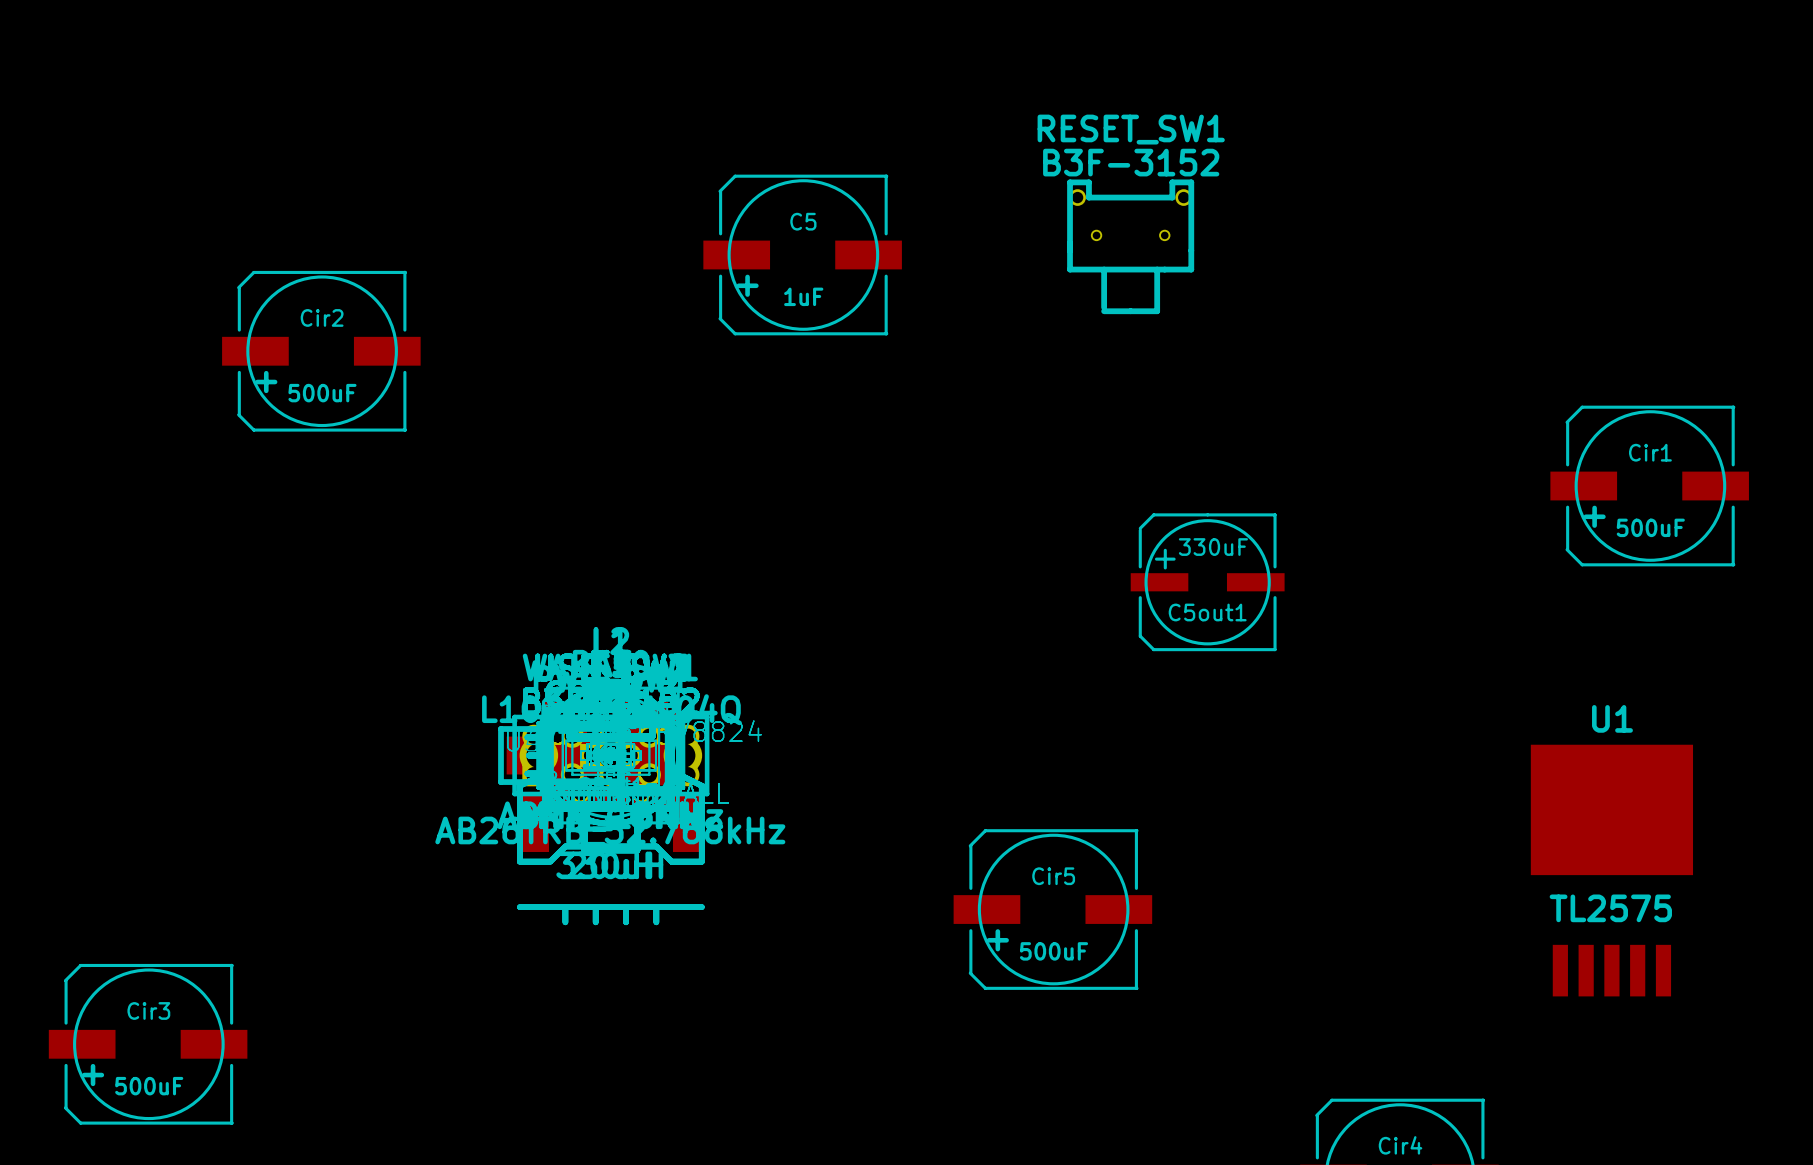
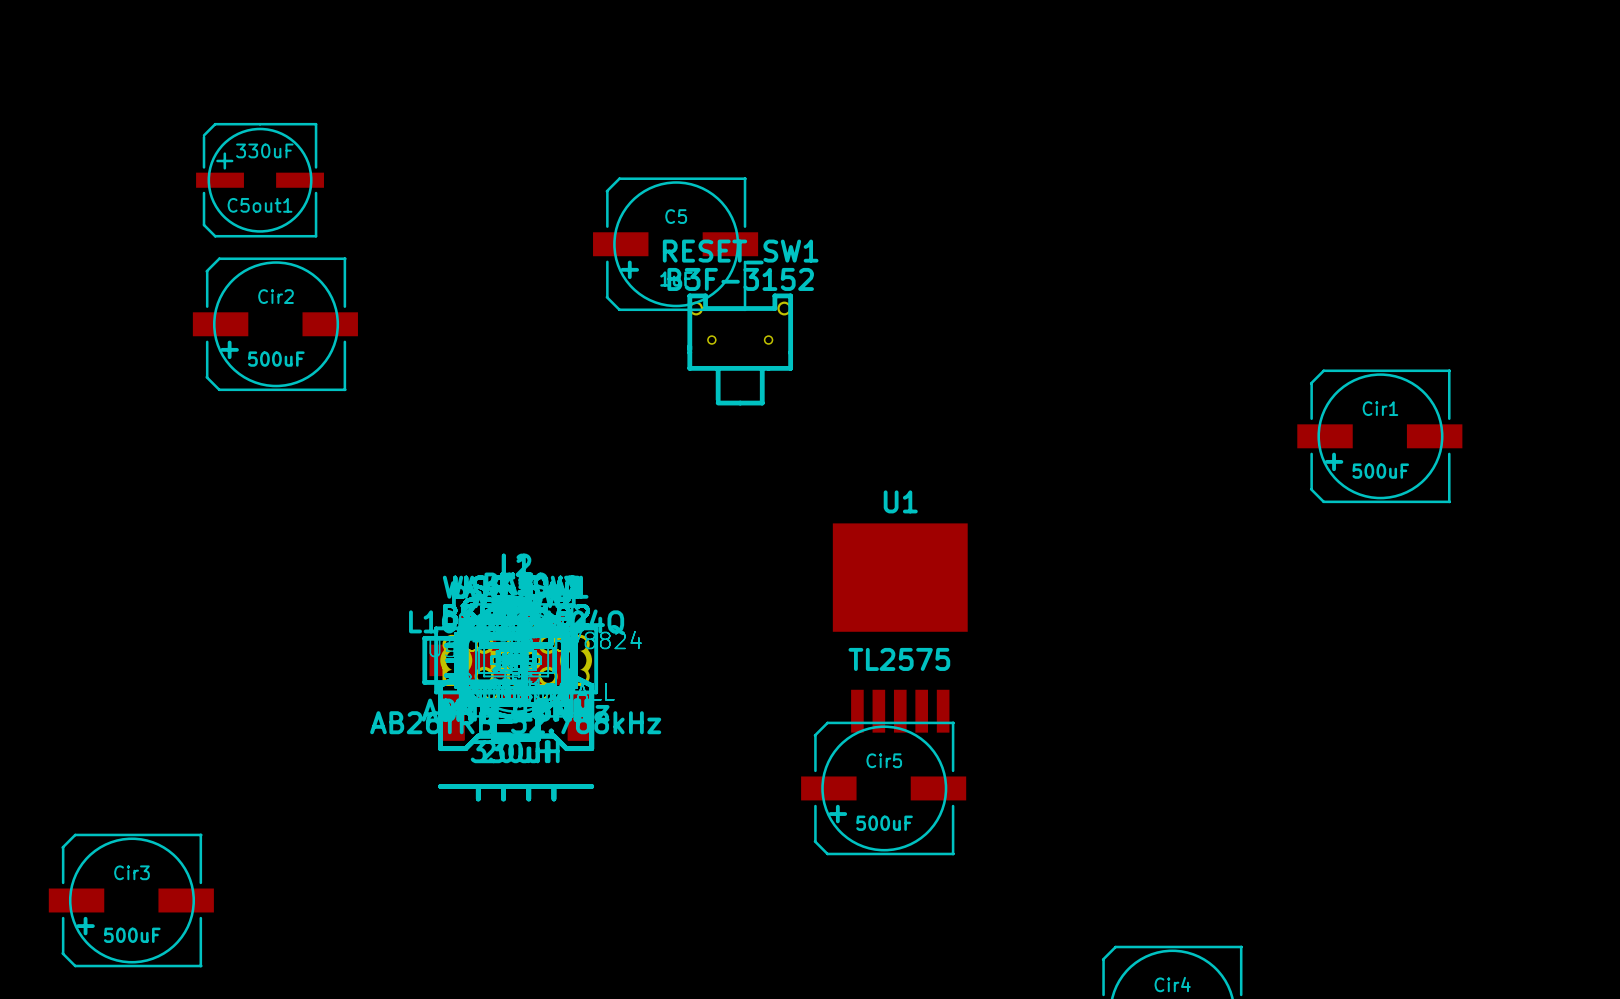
RESET_SW1 position: (1130, 246) -> (740, 349)
C5out1 position: (1207, 582) -> (260, 180)
U1 position: (1611, 870) -> (900, 628)

